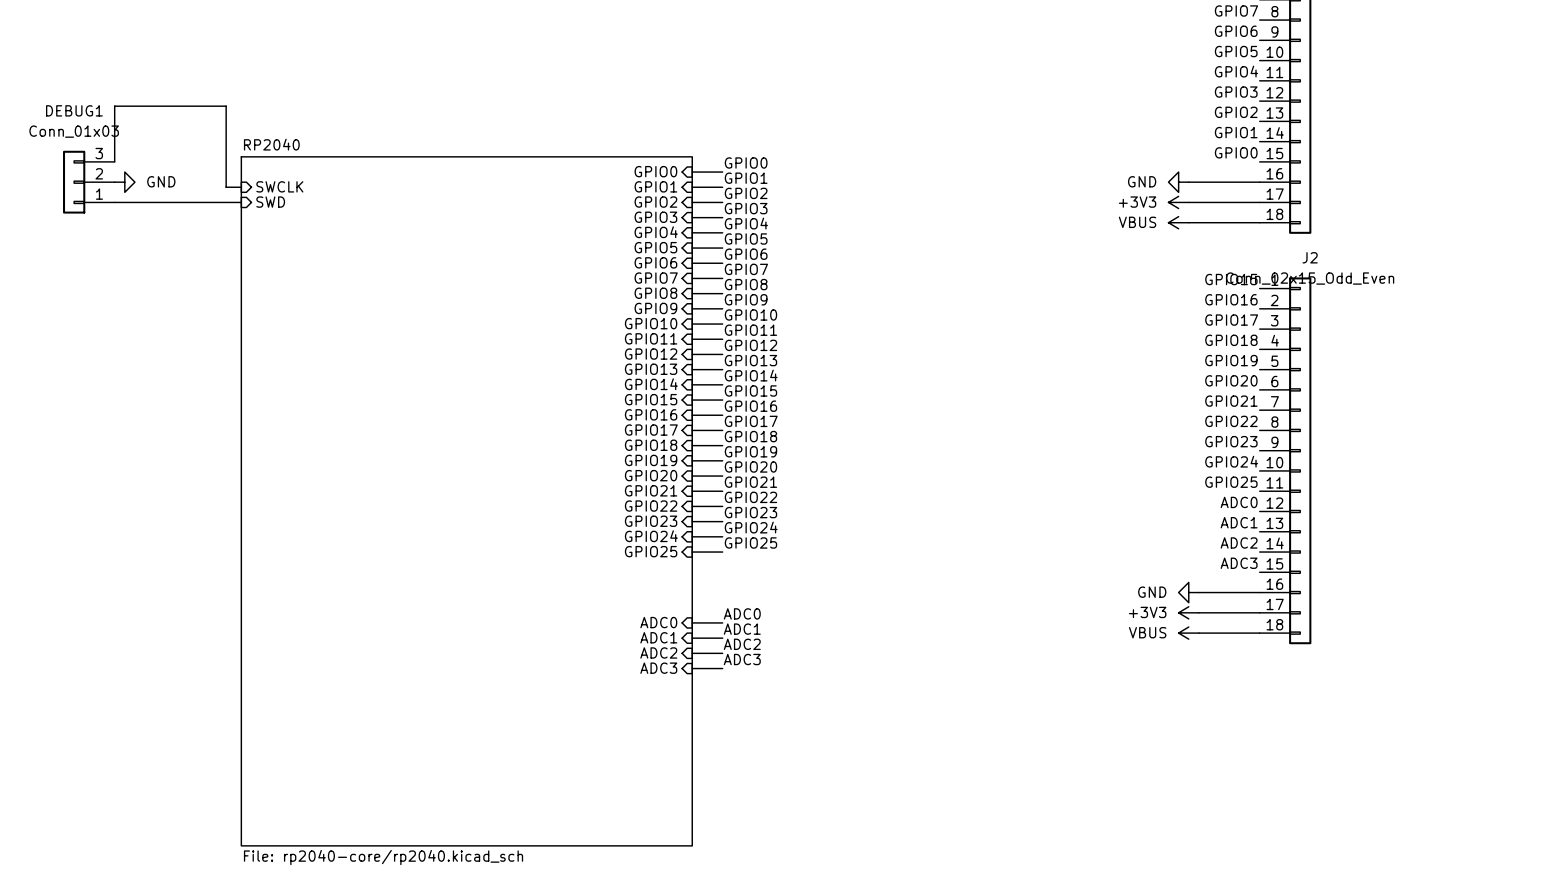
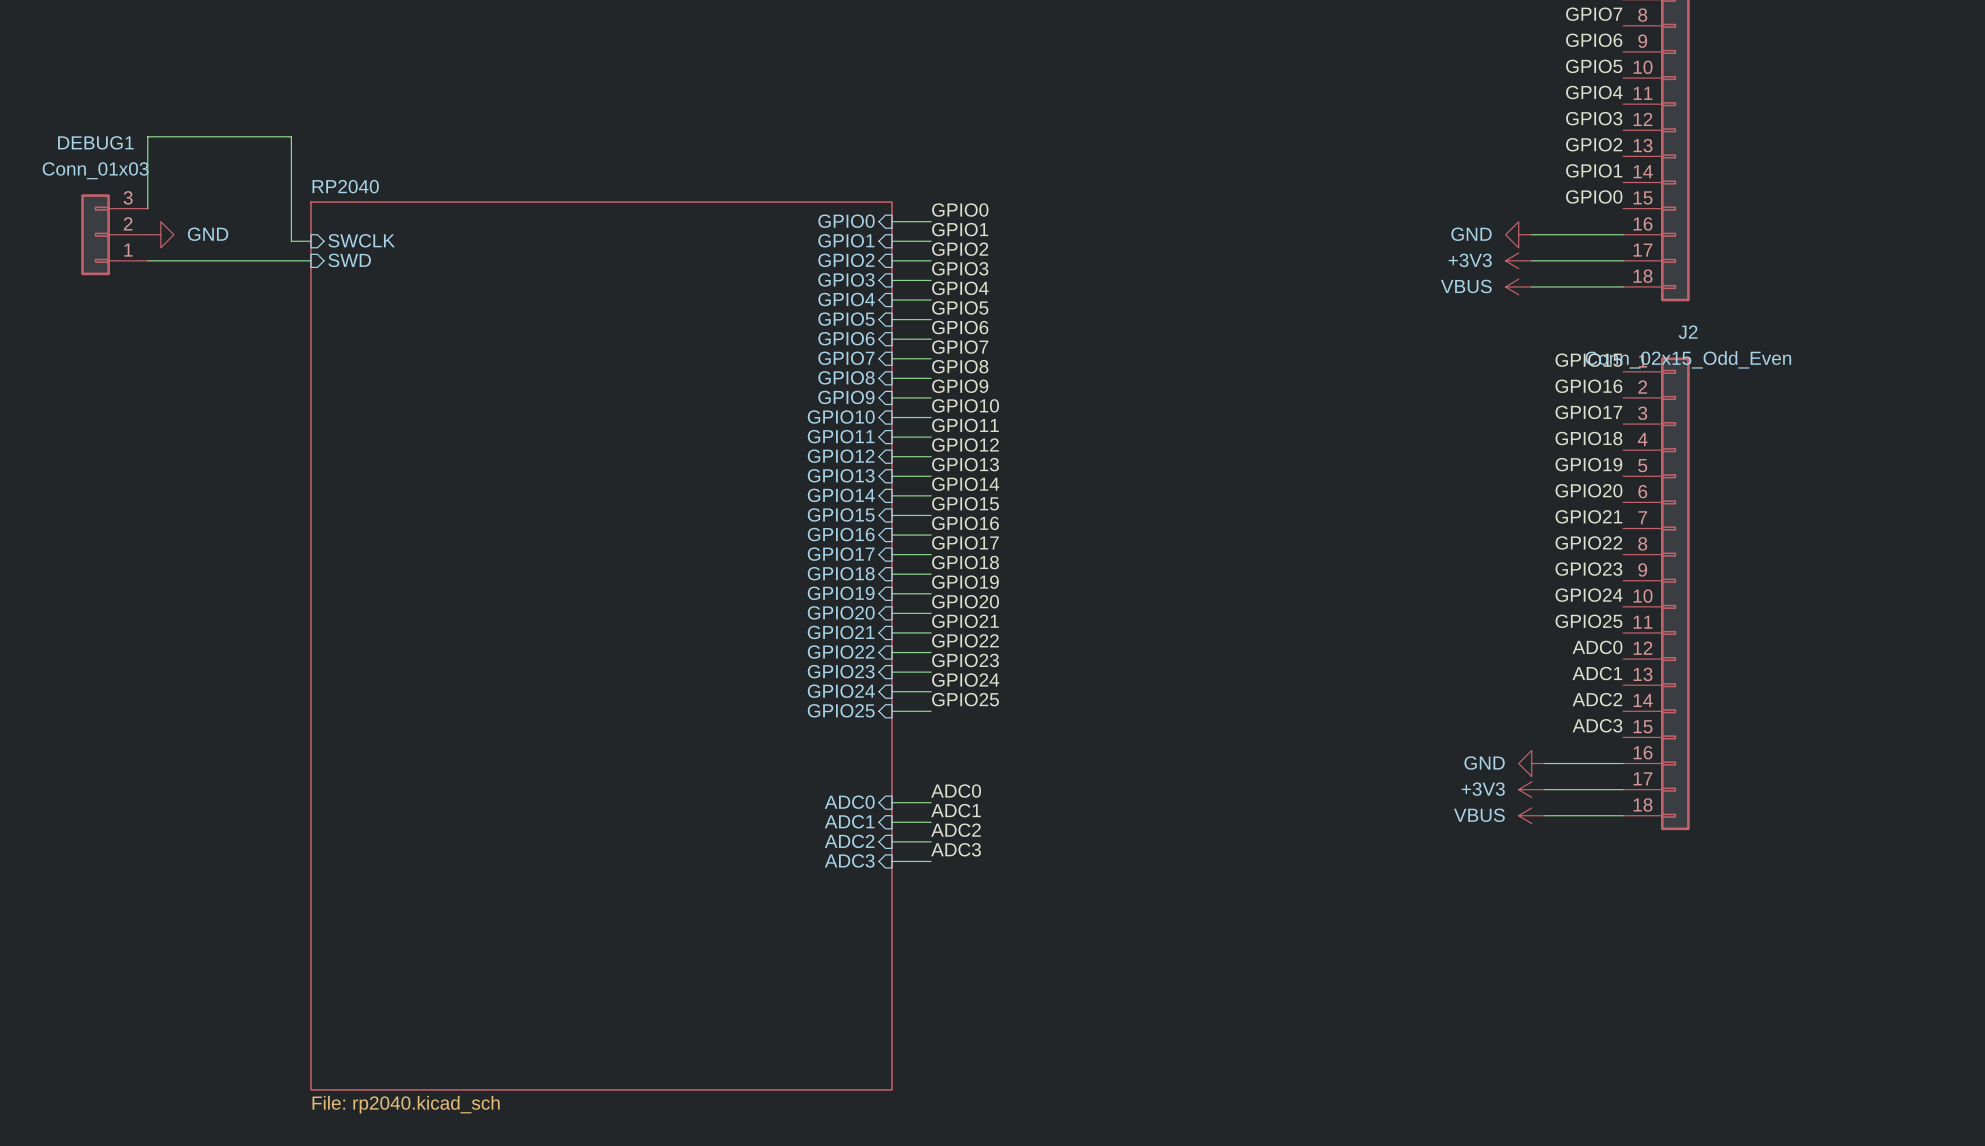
sheet RP2040 value: File: rp2040-core/rp2040.kicad_sch (383, 857) -> File: rp2040.kicad_sch (406, 1104)

